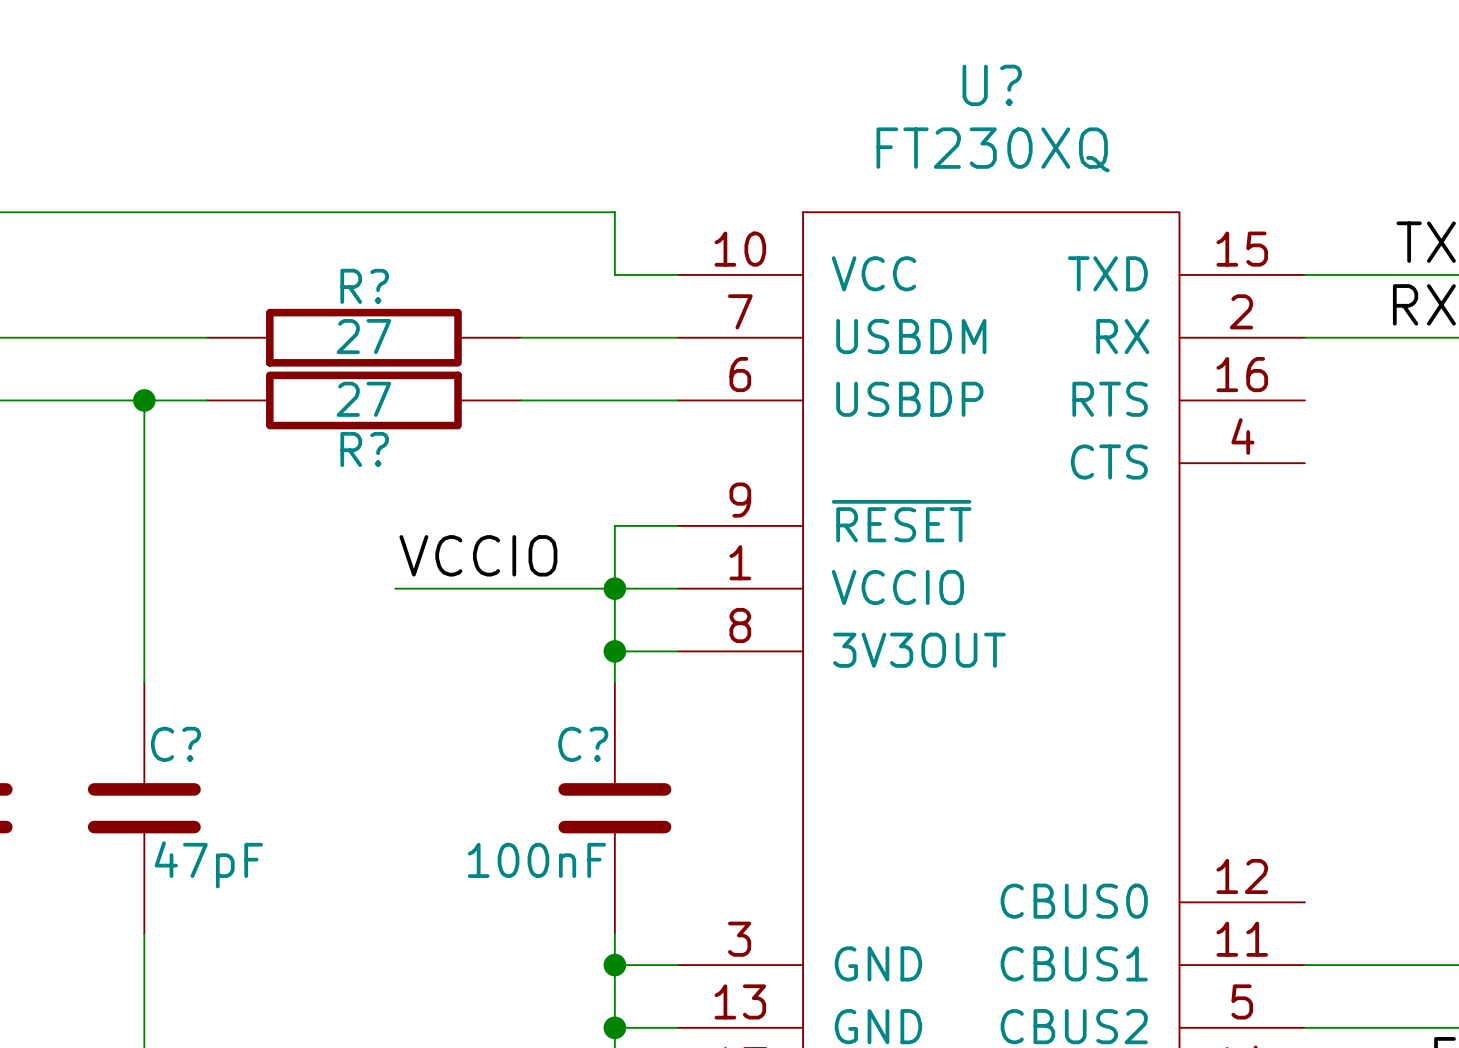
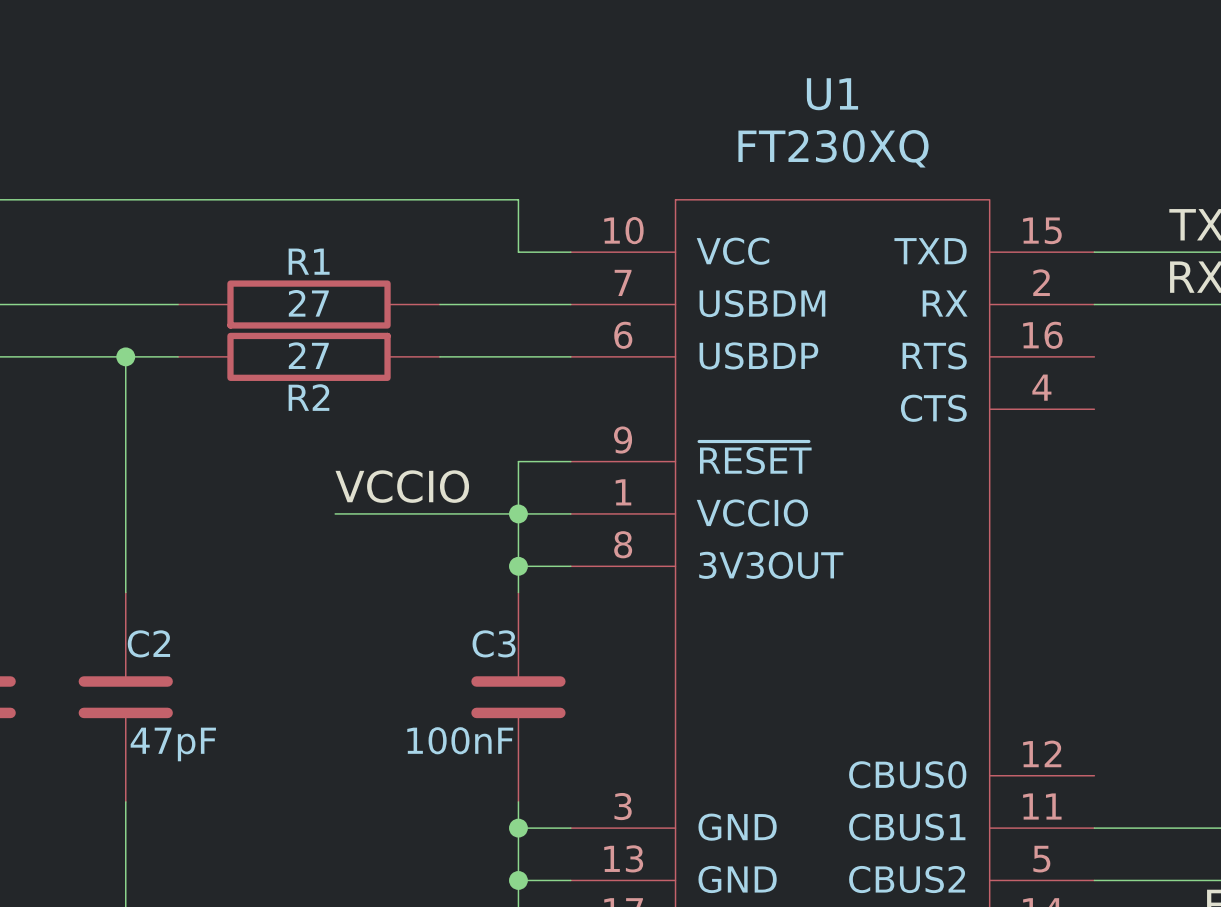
U? name: U? (992, 85) -> U1 (832, 94)
R? name: R? (364, 286) -> R1 (309, 261)
R? name: R? (364, 449) -> R2 (308, 397)
C? name: C? (175, 744) -> C2 (148, 643)
C? name: C? (583, 744) -> C3 (494, 643)

